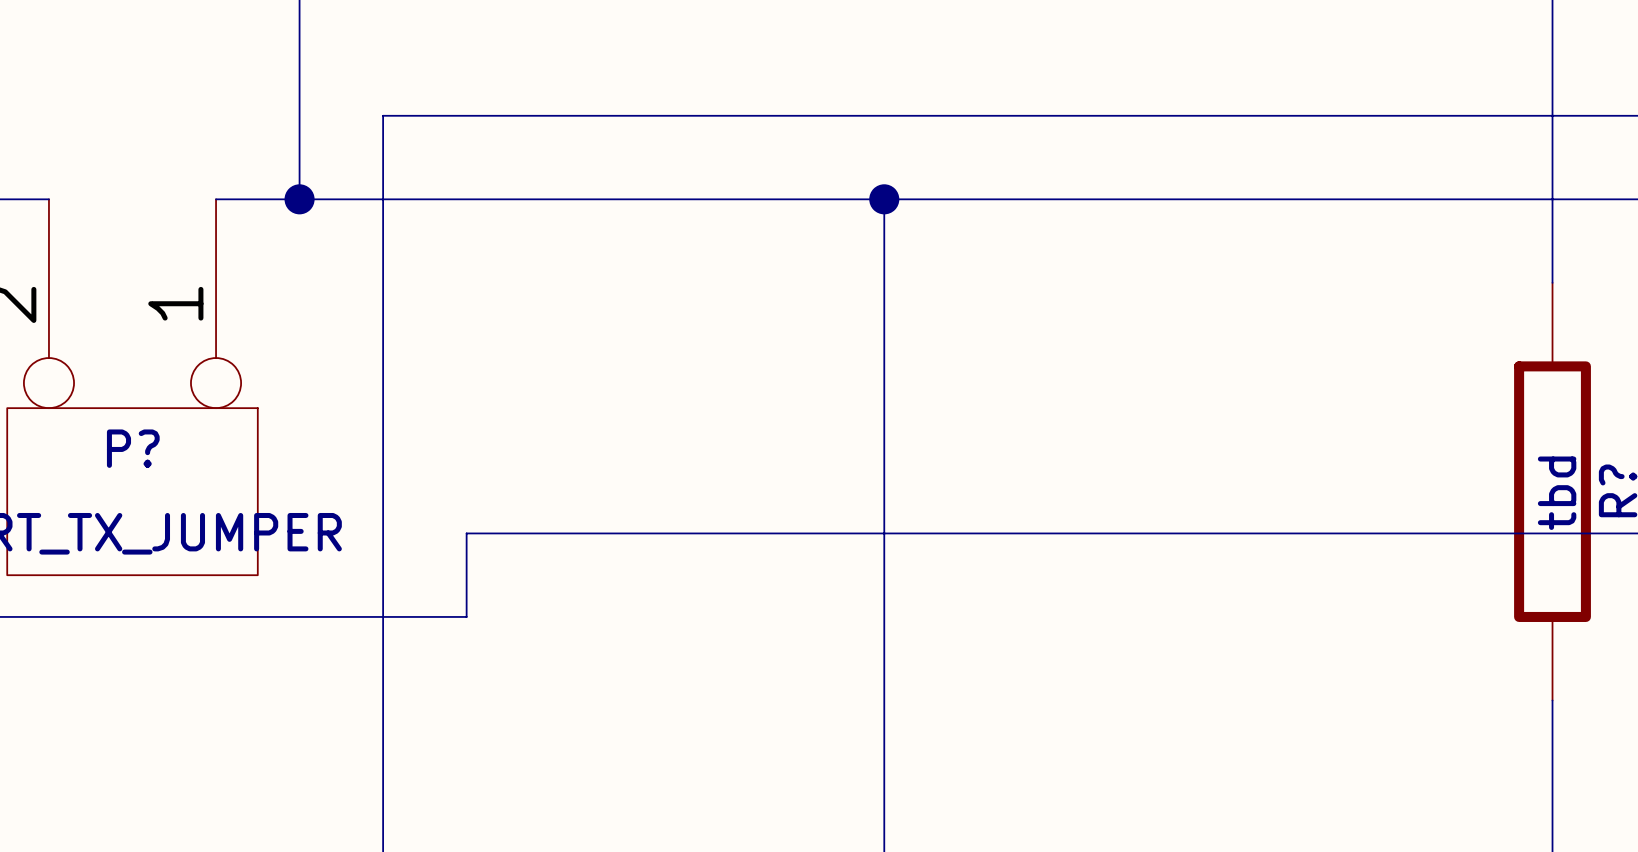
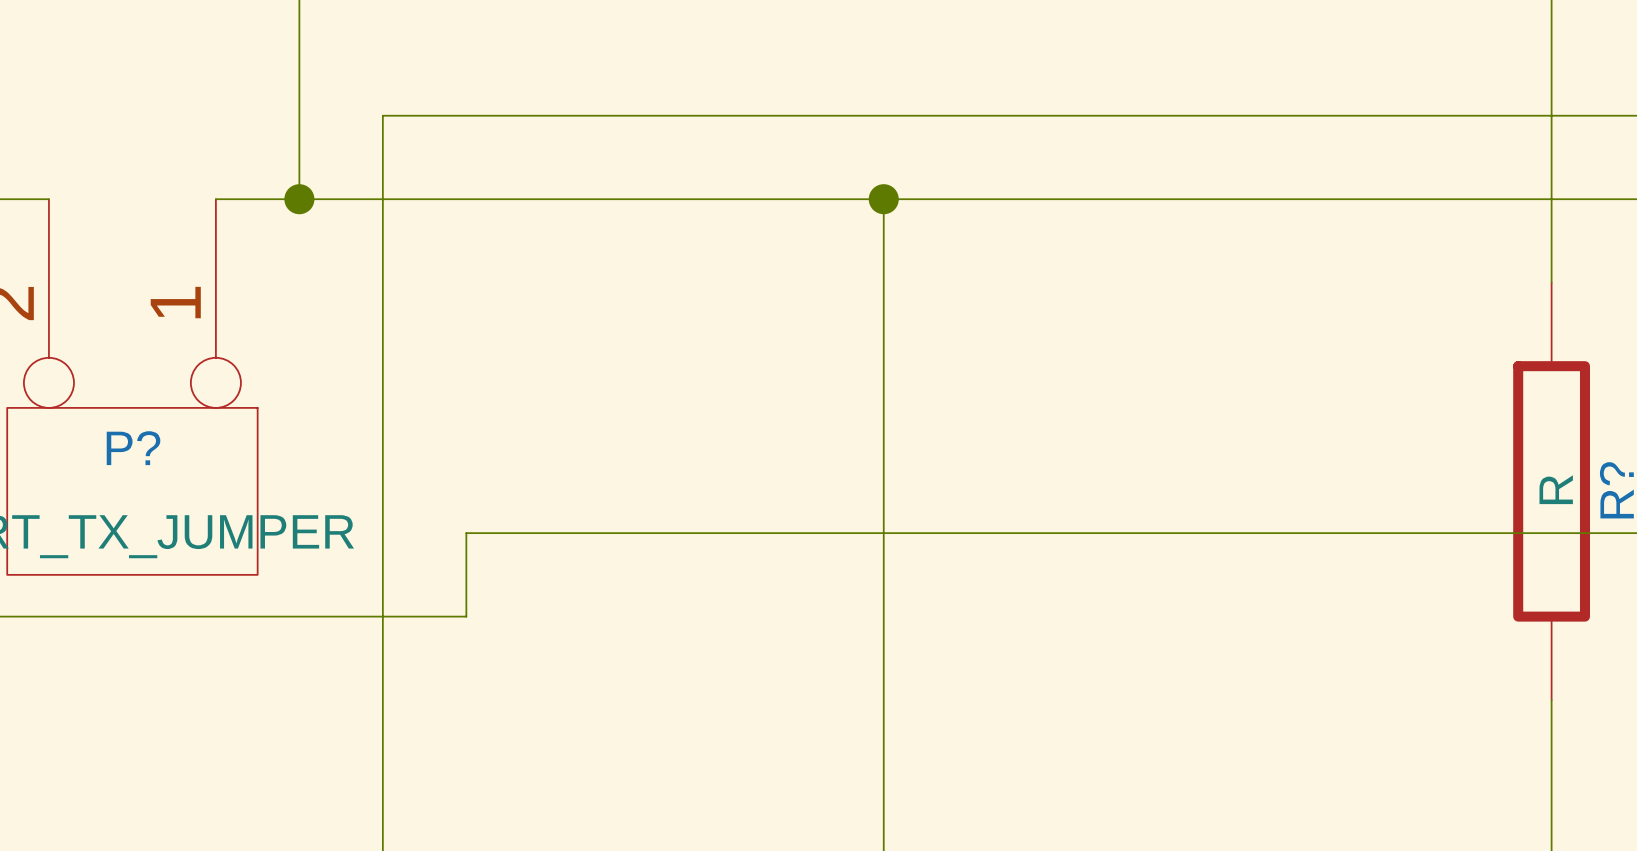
R? value: tbd (1557, 493) -> R (1556, 489)

